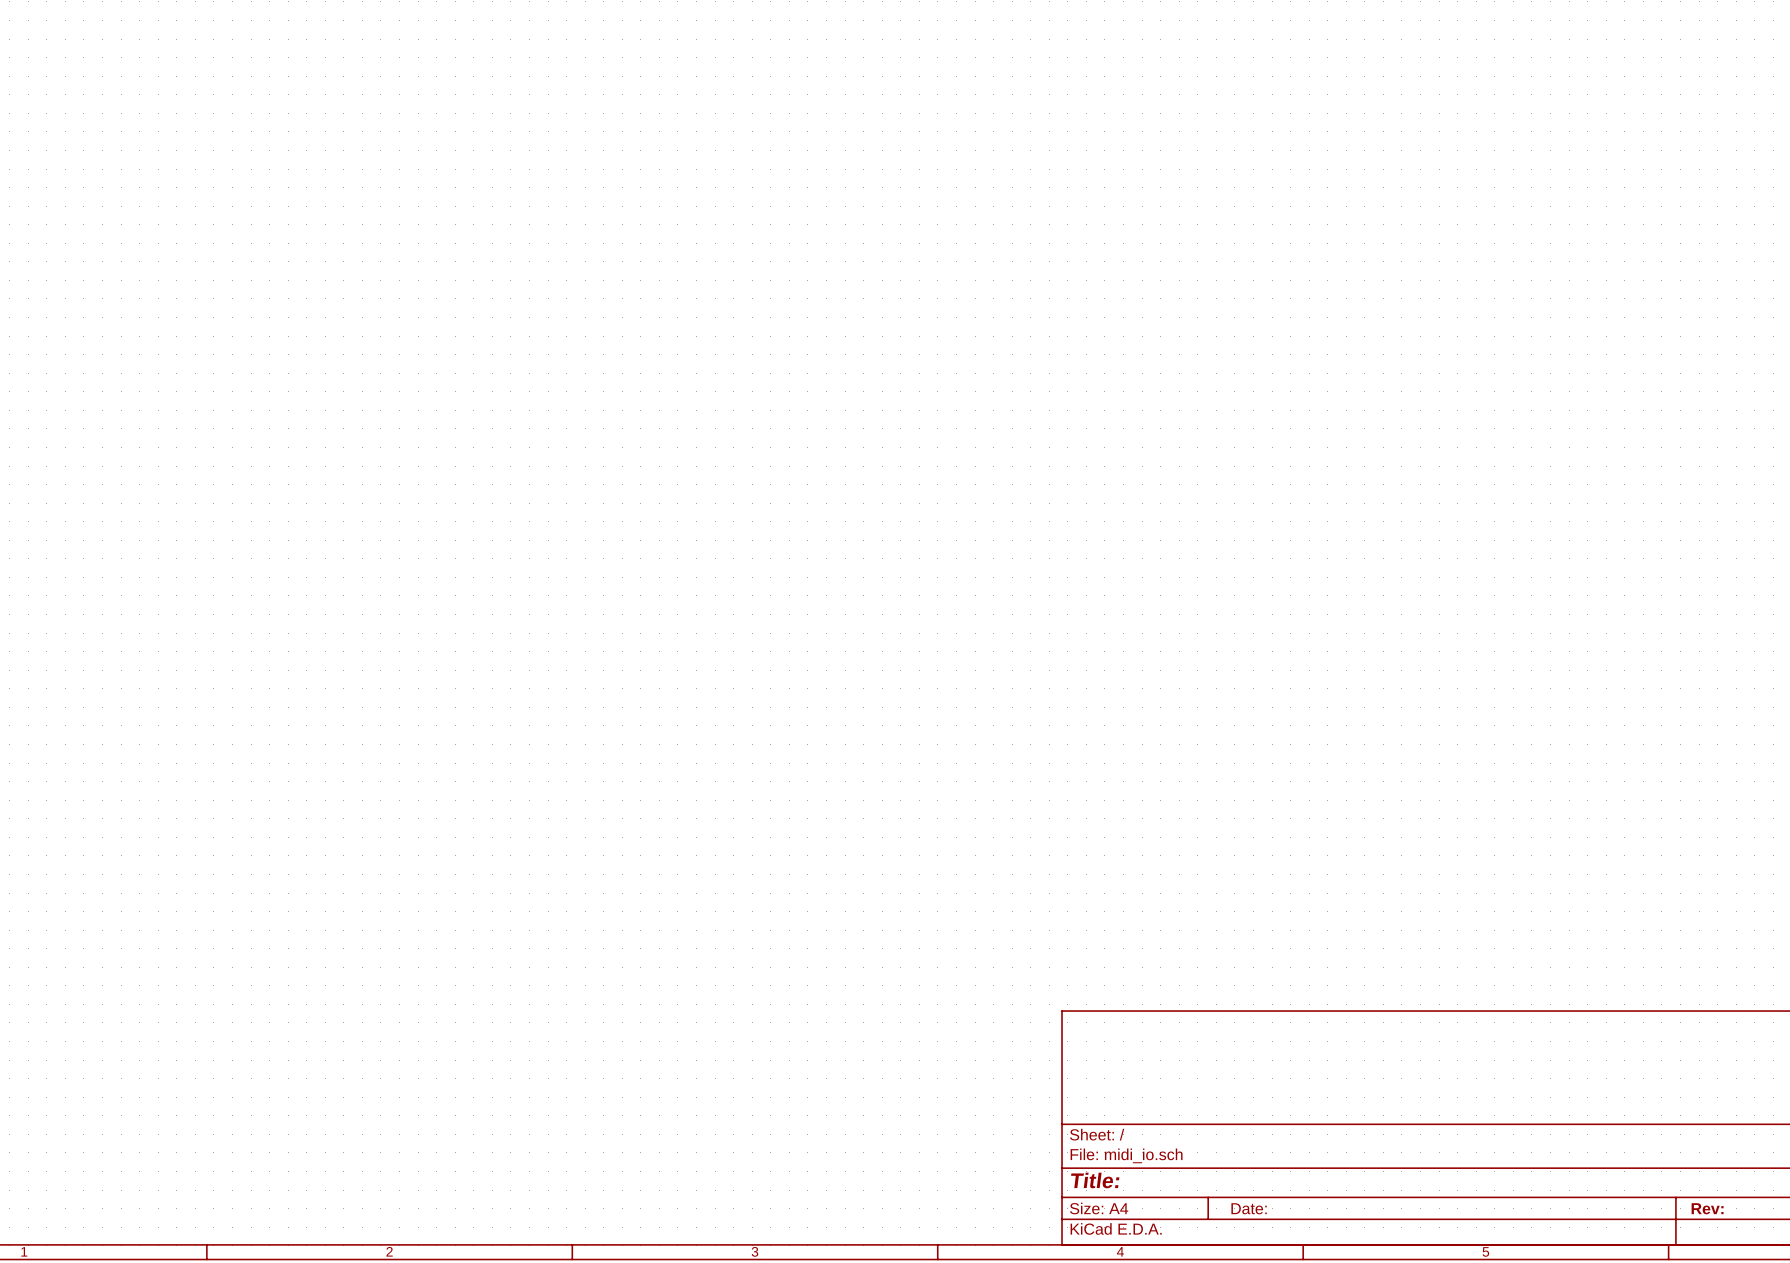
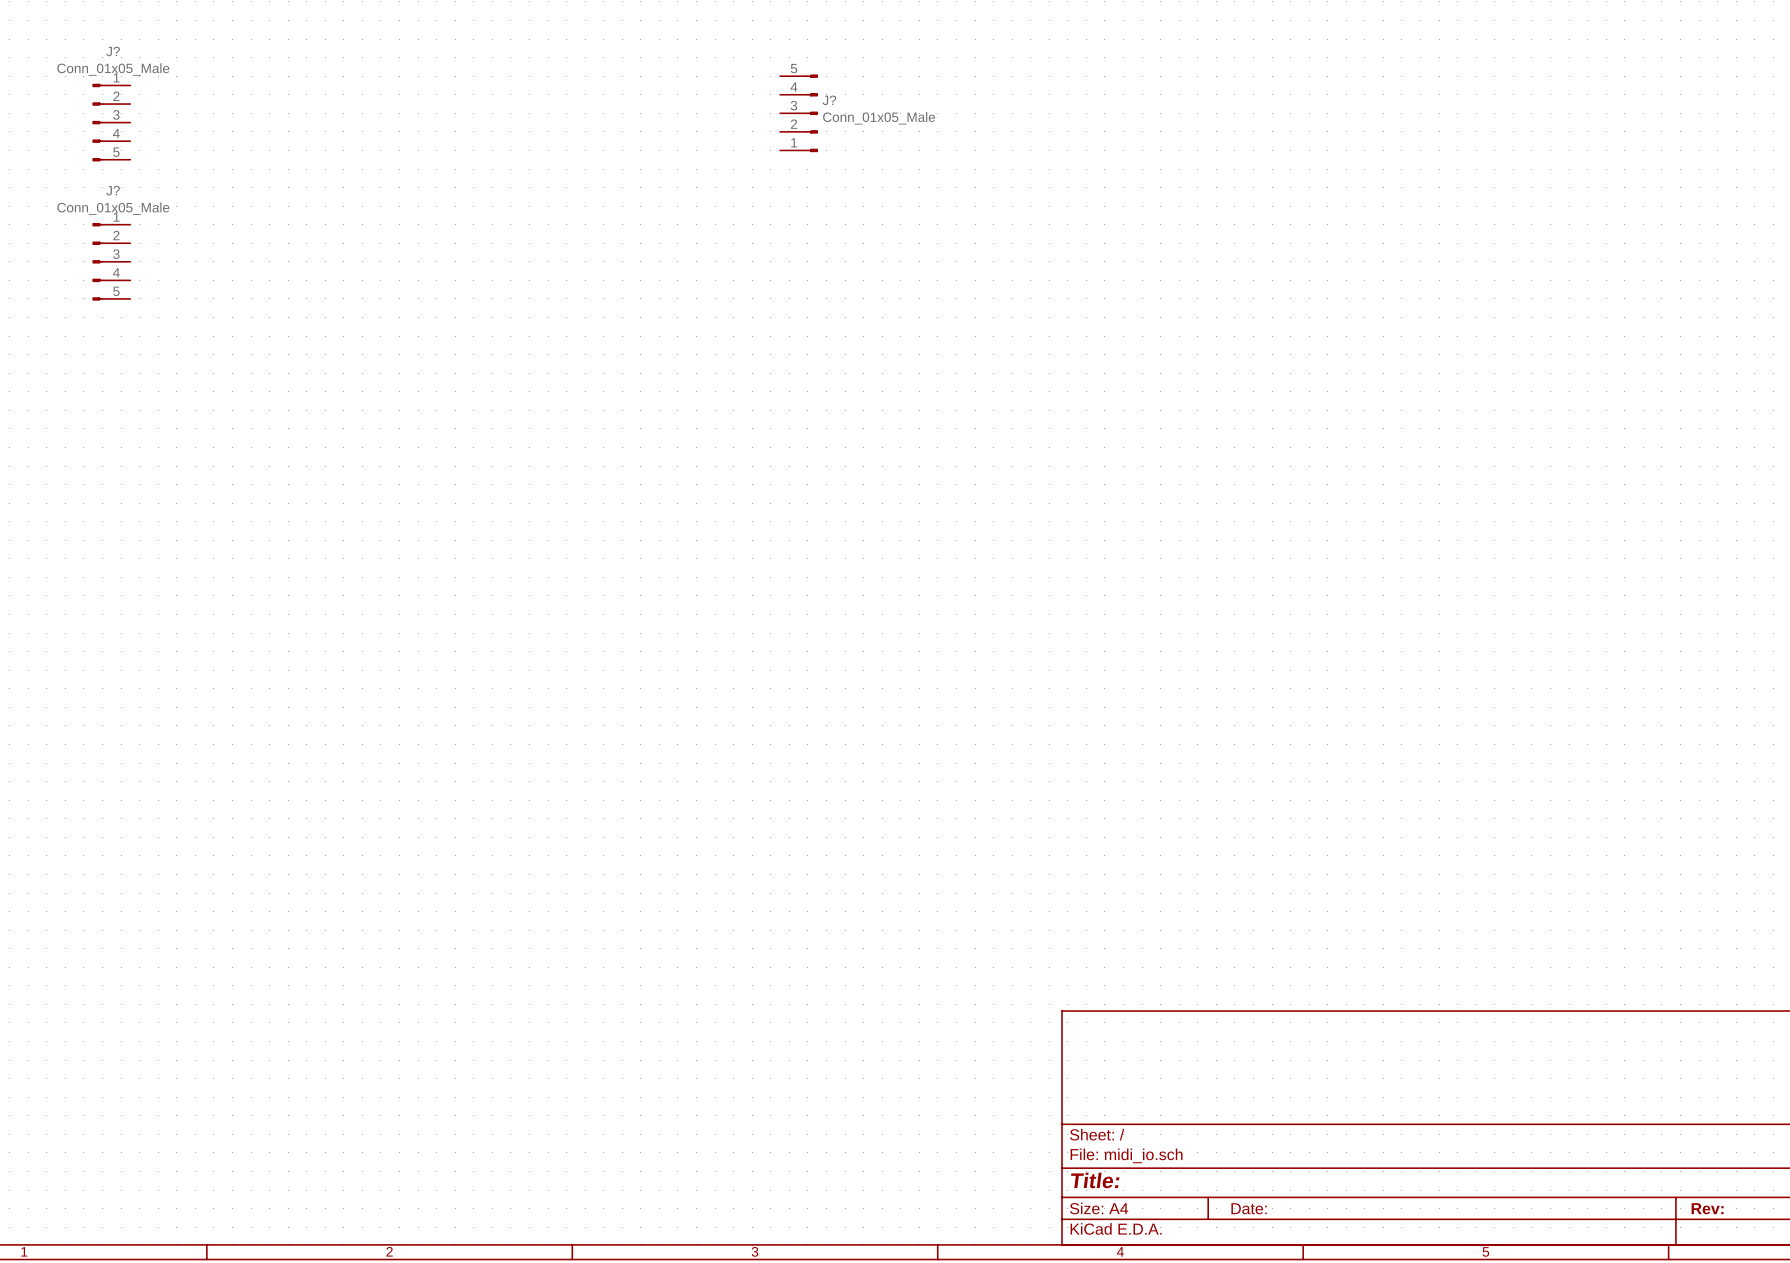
J?: none -> Conn_01x05_Male (798, 113)
J?: none -> Conn_01x05_Male (111, 122)
J?: none -> Conn_01x05_Male (111, 261)

